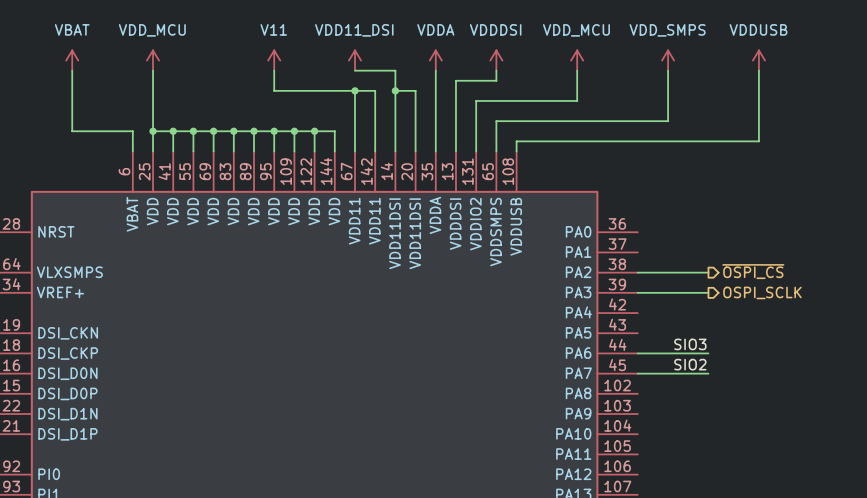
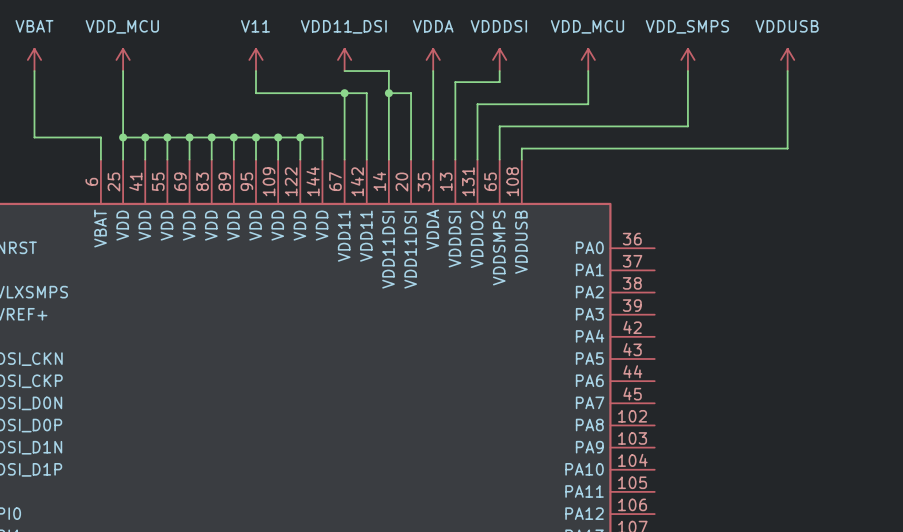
hierarchical label: ~{OSPI_CS} (753, 271) -> none
wire: (637, 272) (708, 272) -> none
wire: (637, 292) (708, 292) -> none
hierarchical label: OSPI_SCLK (762, 292) -> none
label: SIO3 (690, 344) -> none
wire: (637, 353) (708, 353) -> none
label: SIO2 (690, 364) -> none
wire: (637, 373) (708, 373) -> none

